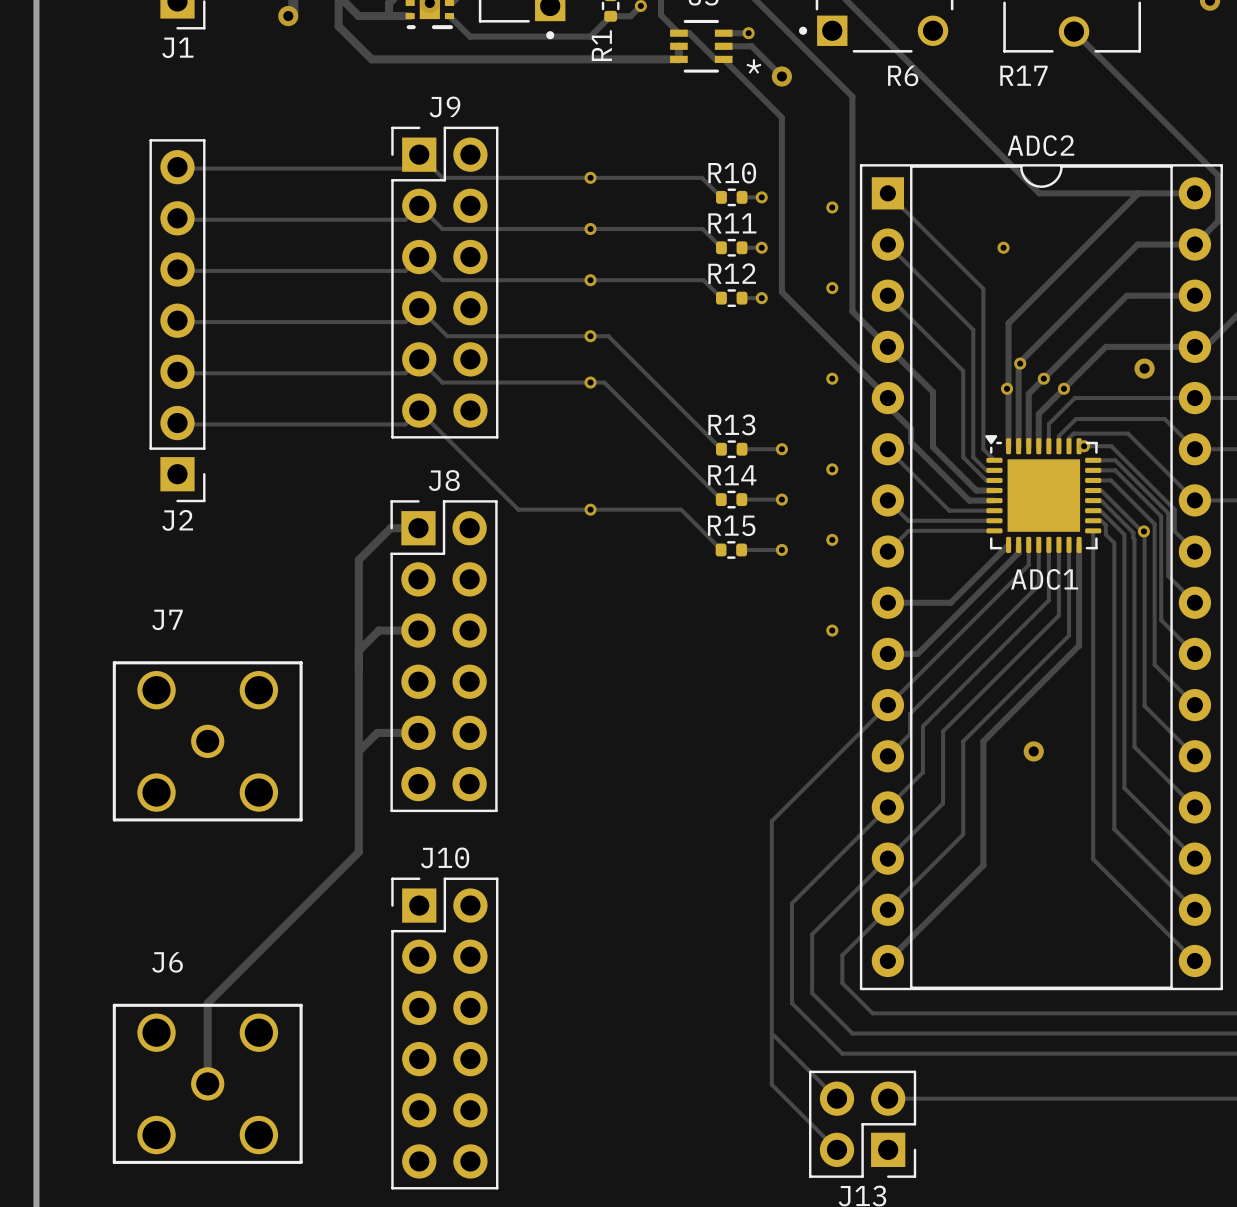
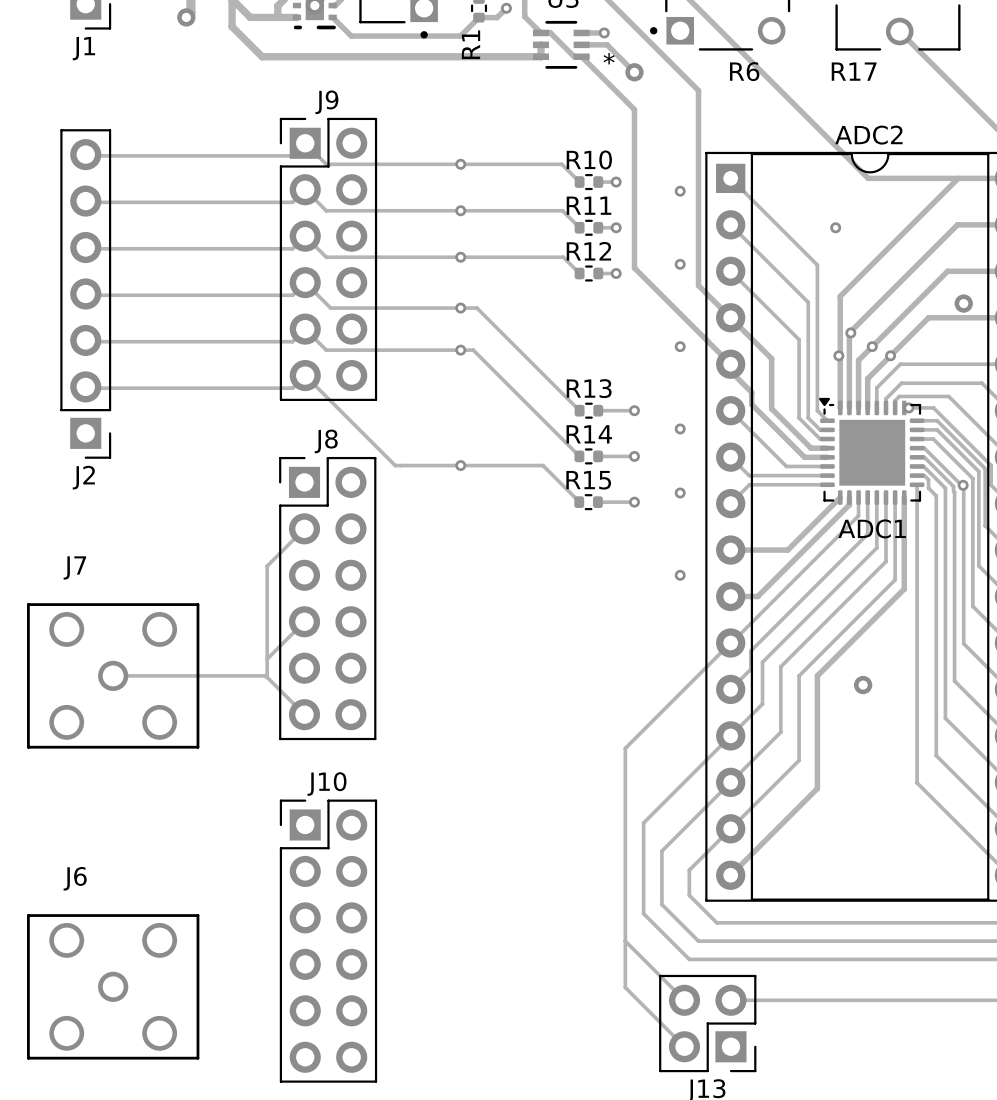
via position: (1144, 368) -> (963, 303)
track: (418, 528) (390, 528) (358, 560) (358, 852) (207, 1003) (207, 1083) -> none
track: none -> (304, 528) (267, 566) (267, 677)
track: (418, 630) (378, 630) (358, 650) -> none
track: none -> (304, 621) (267, 659)
track: (418, 732) (377, 732) (358, 751) -> none
track: none -> (113, 675) (265, 675) (304, 714)

